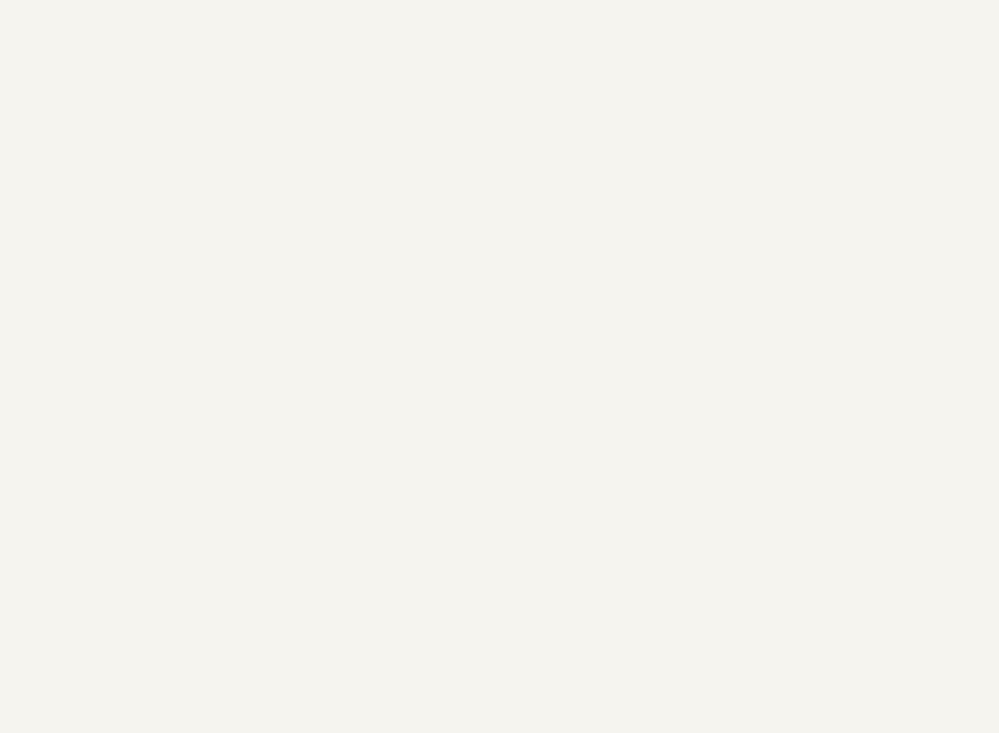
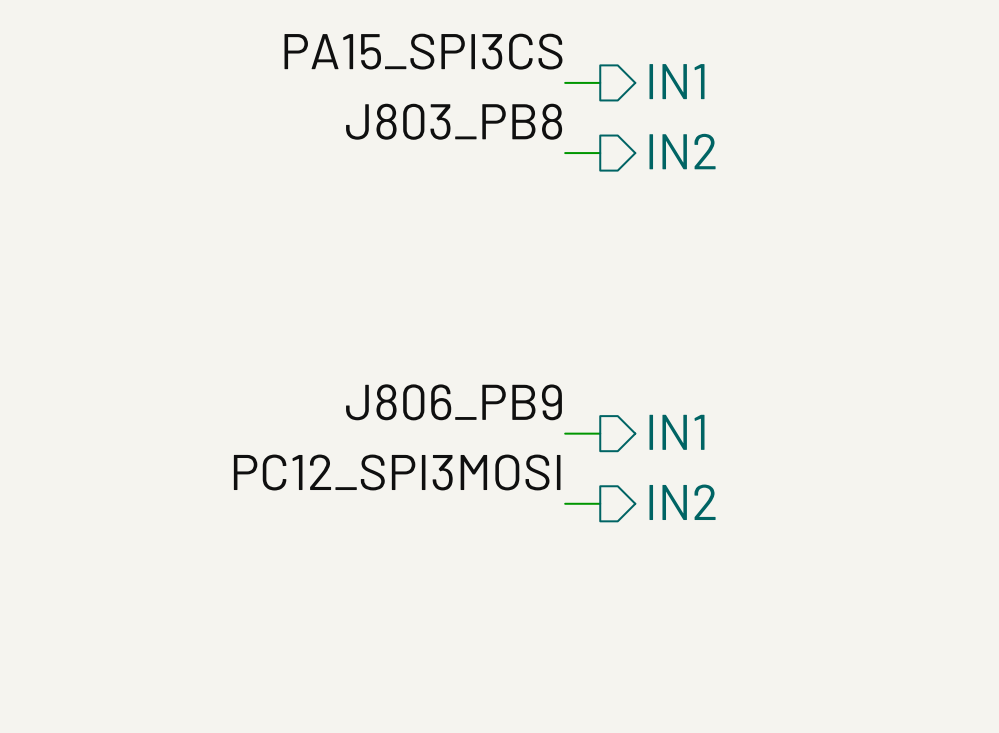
label: none -> PA15_SPI3CS (423, 51)
sheet pin: none -> IN1 (677, 81)
wire: none -> (565, 82) (600, 82)
label: none -> J803_PB8 (454, 121)
sheet pin: none -> IN2 (682, 151)
wire: none -> (565, 153) (600, 153)
label: none -> J806_PB9 (453, 402)
sheet pin: none -> IN1 (677, 432)
wire: none -> (565, 433) (600, 433)
label: none -> PC12_SPI3MOSI (397, 472)
sheet pin: none -> IN2 (682, 502)
wire: none -> (565, 503) (600, 503)

